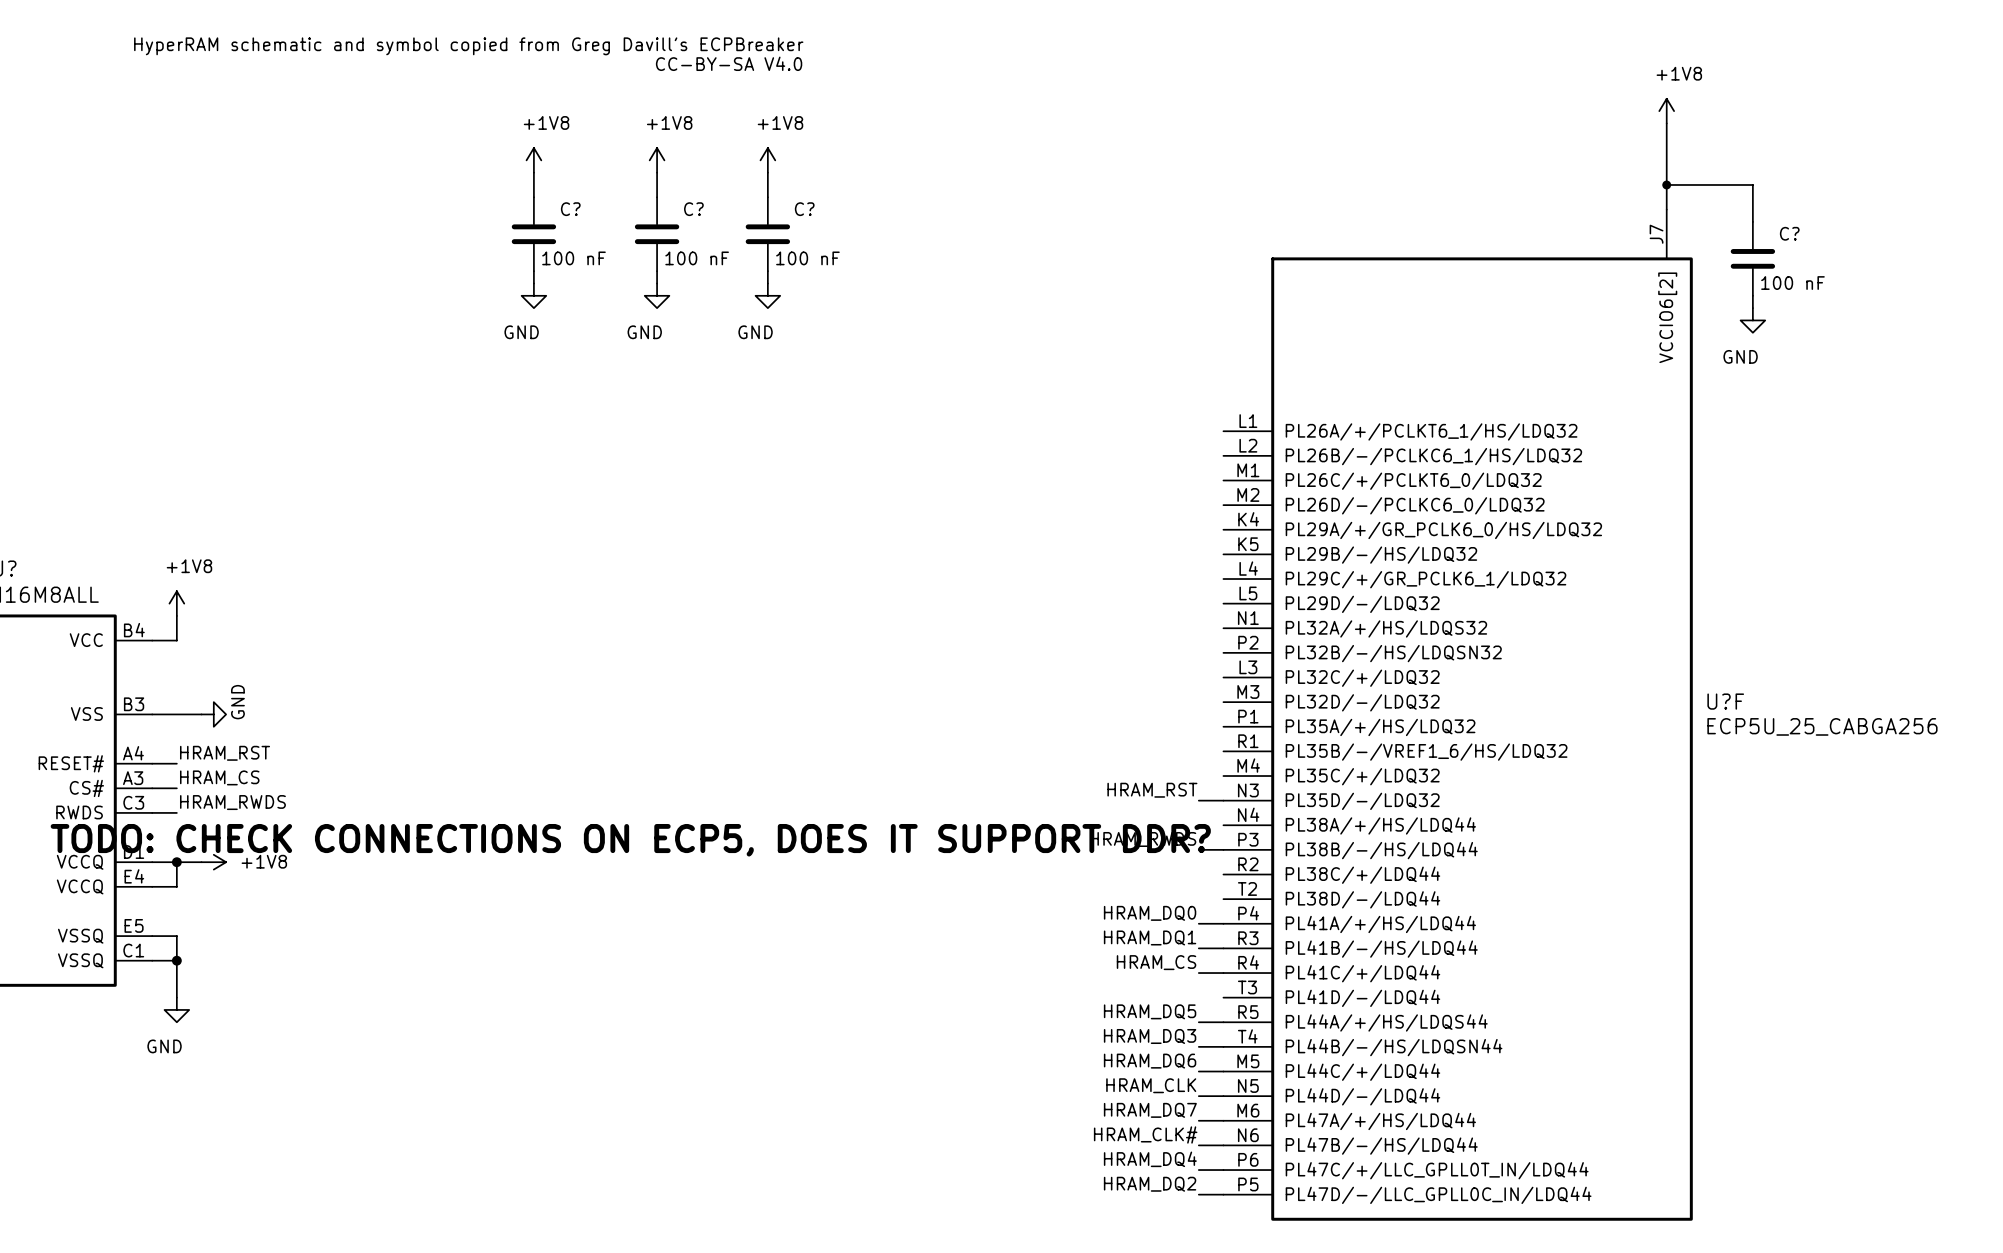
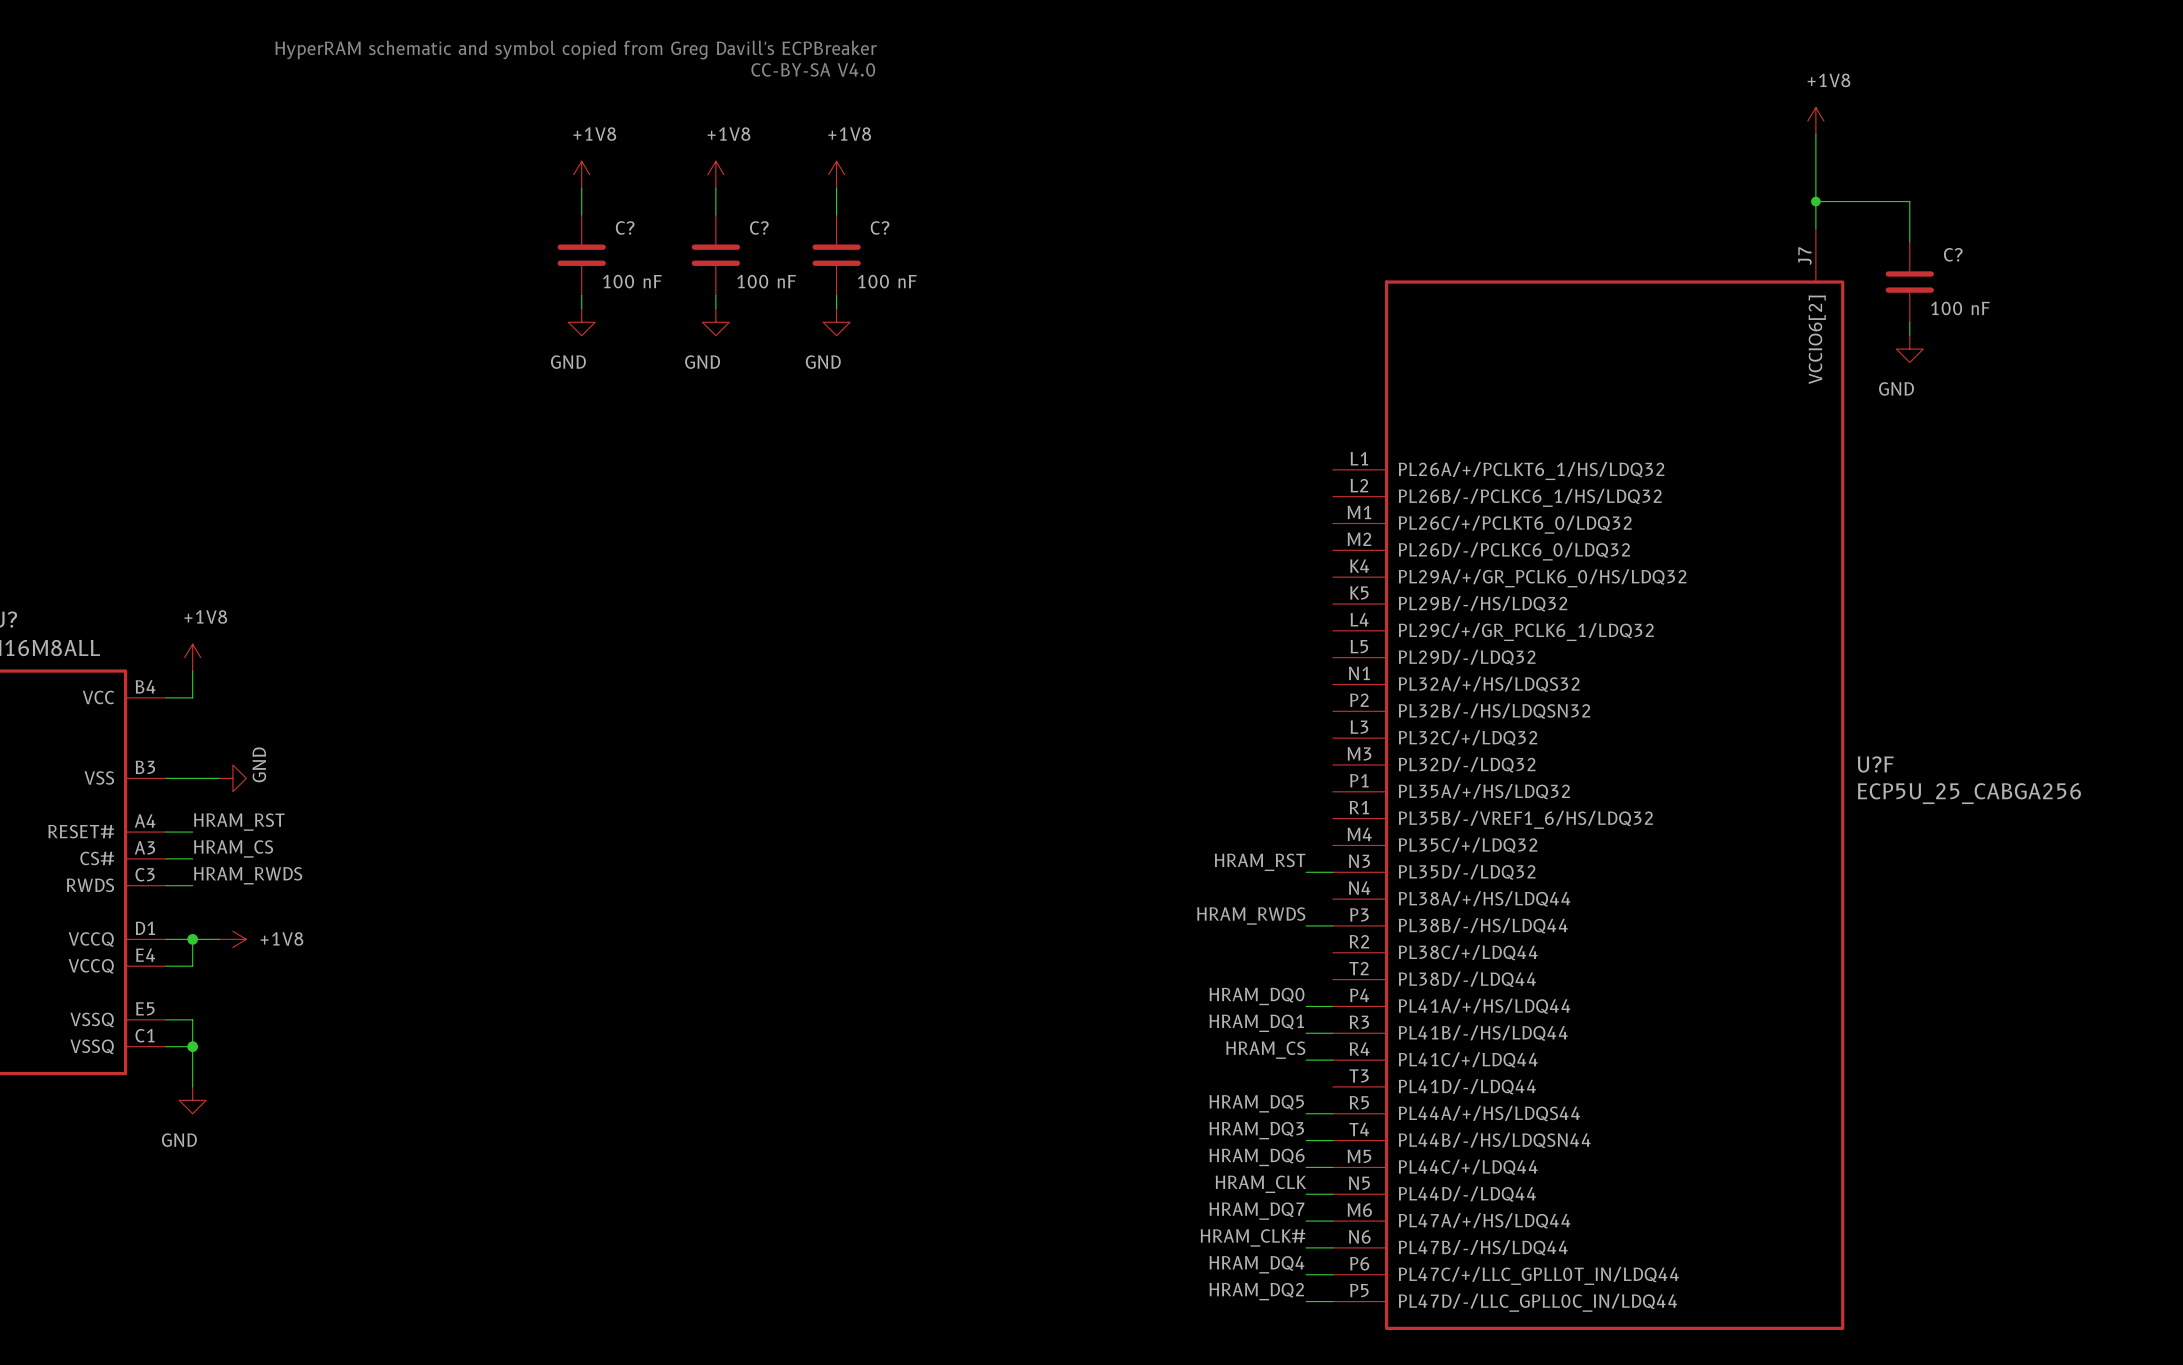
text: TODO: CHECK CONNECTIONS ON ECP5, DOES IT SUPPORT DDR? (630, 840) -> none

